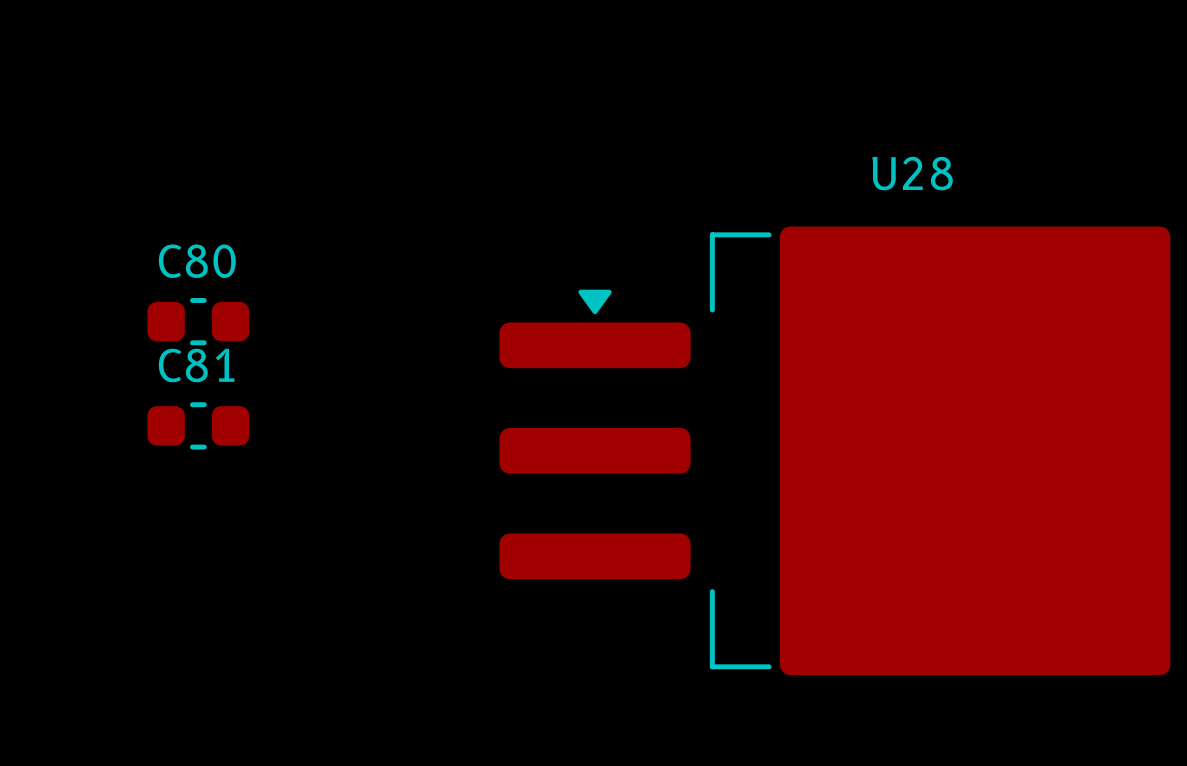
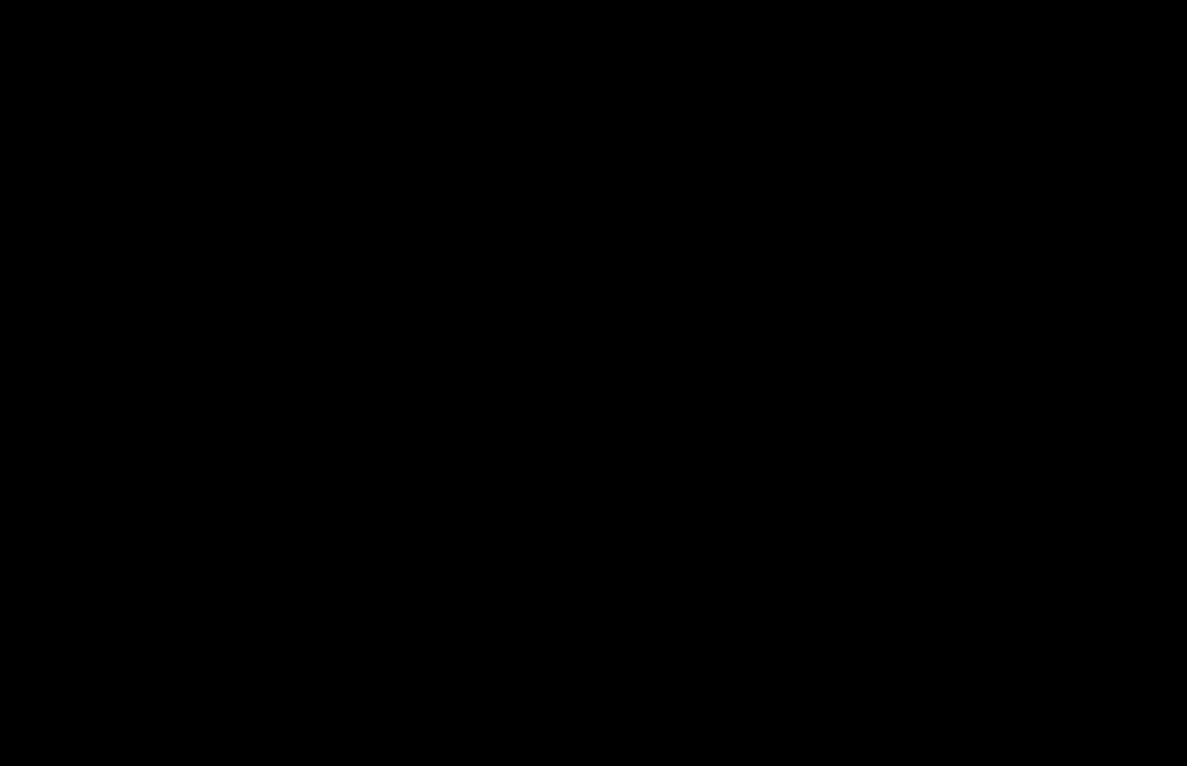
C80: (198, 321) -> none
C81: (198, 425) -> none
U28: (834, 450) -> none

